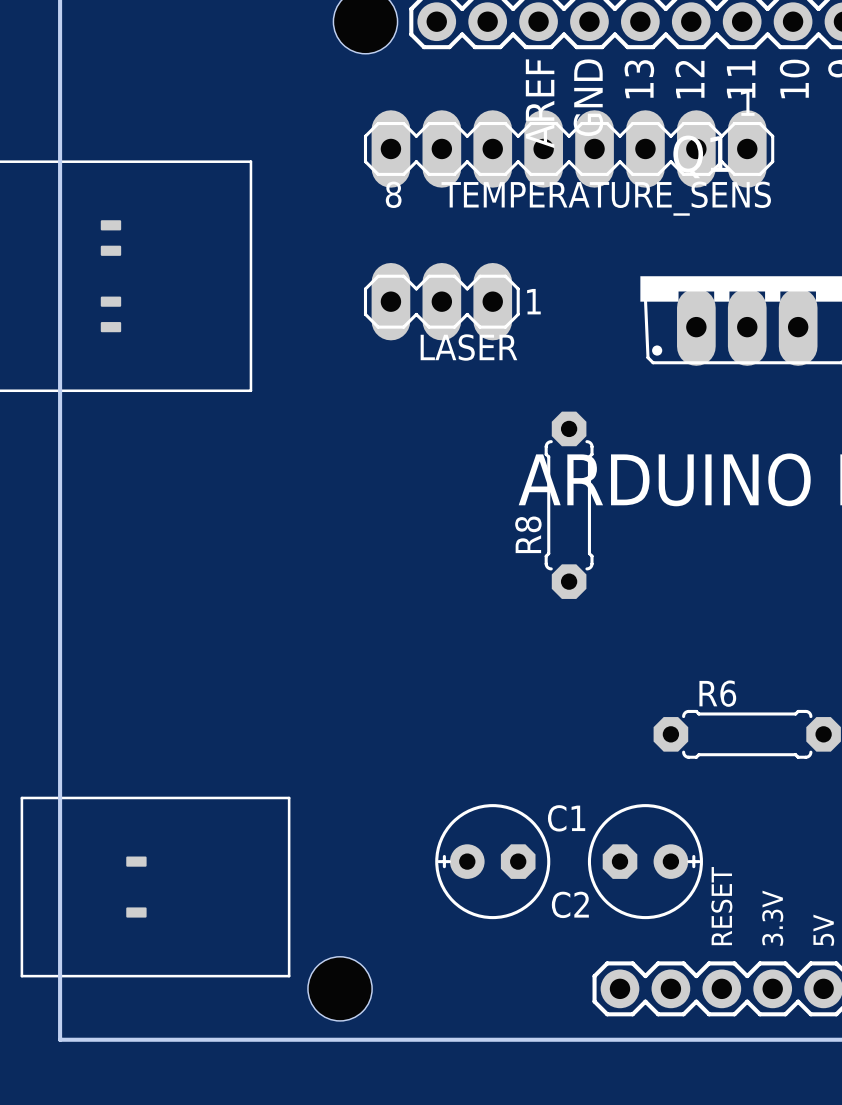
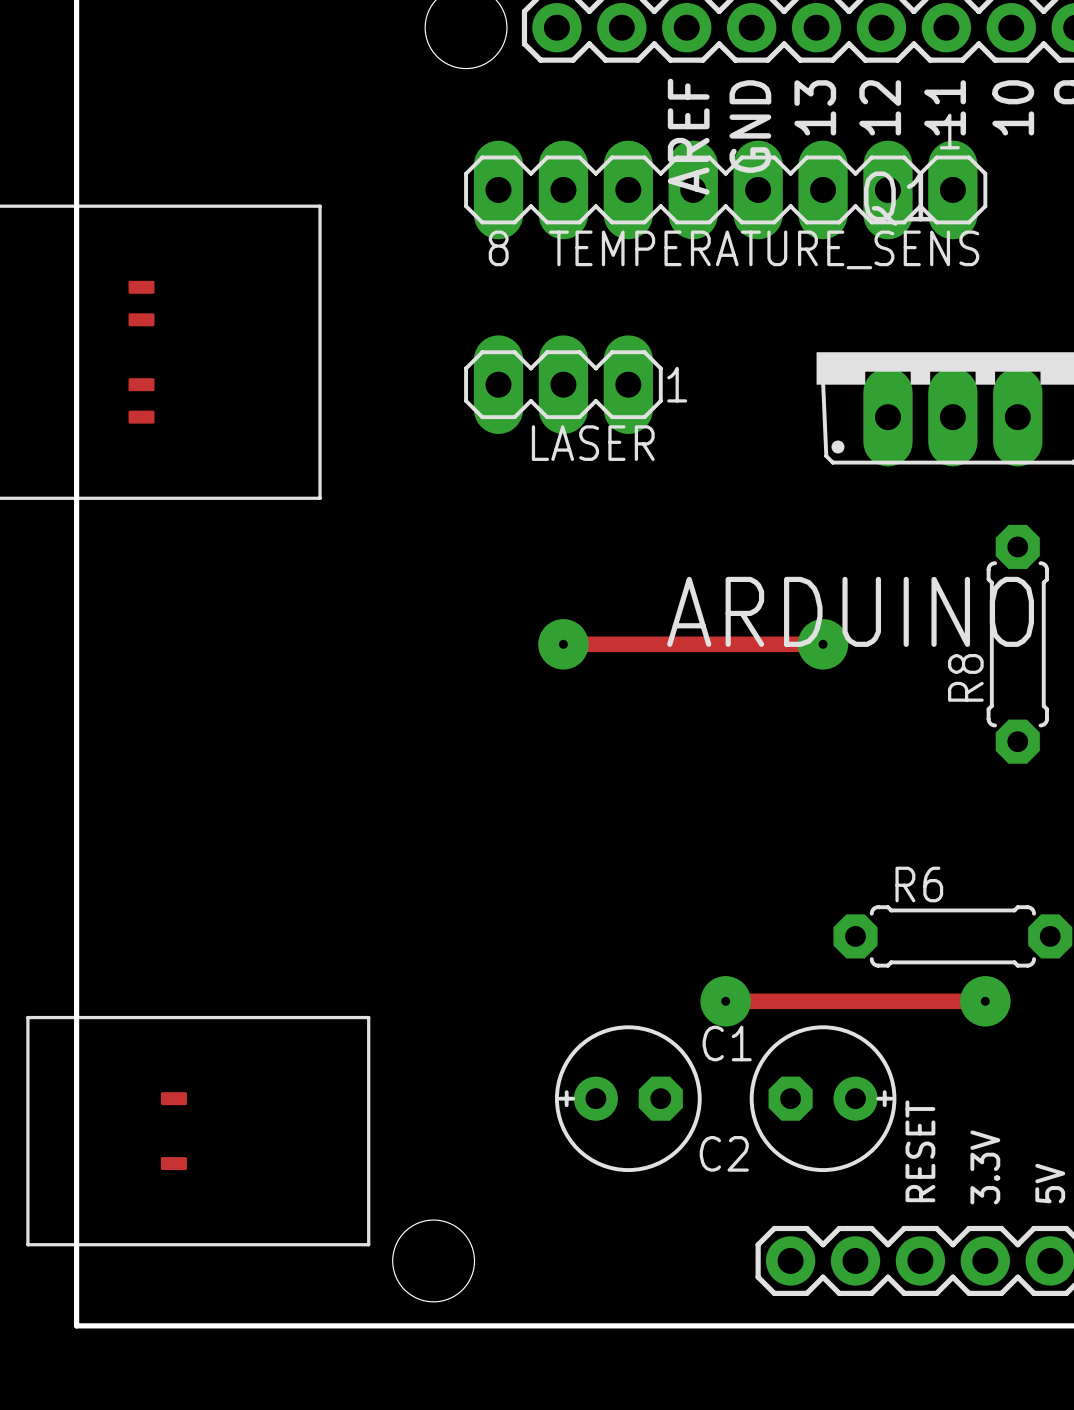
track: none -> (563, 644) (823, 644)
via: none -> (563, 644)
R8 position: (569, 505) -> (1017, 644)
via: none -> (823, 644)
track: none -> (725, 1001) (985, 1001)
via: none -> (725, 1001)
via: none -> (985, 1001)

